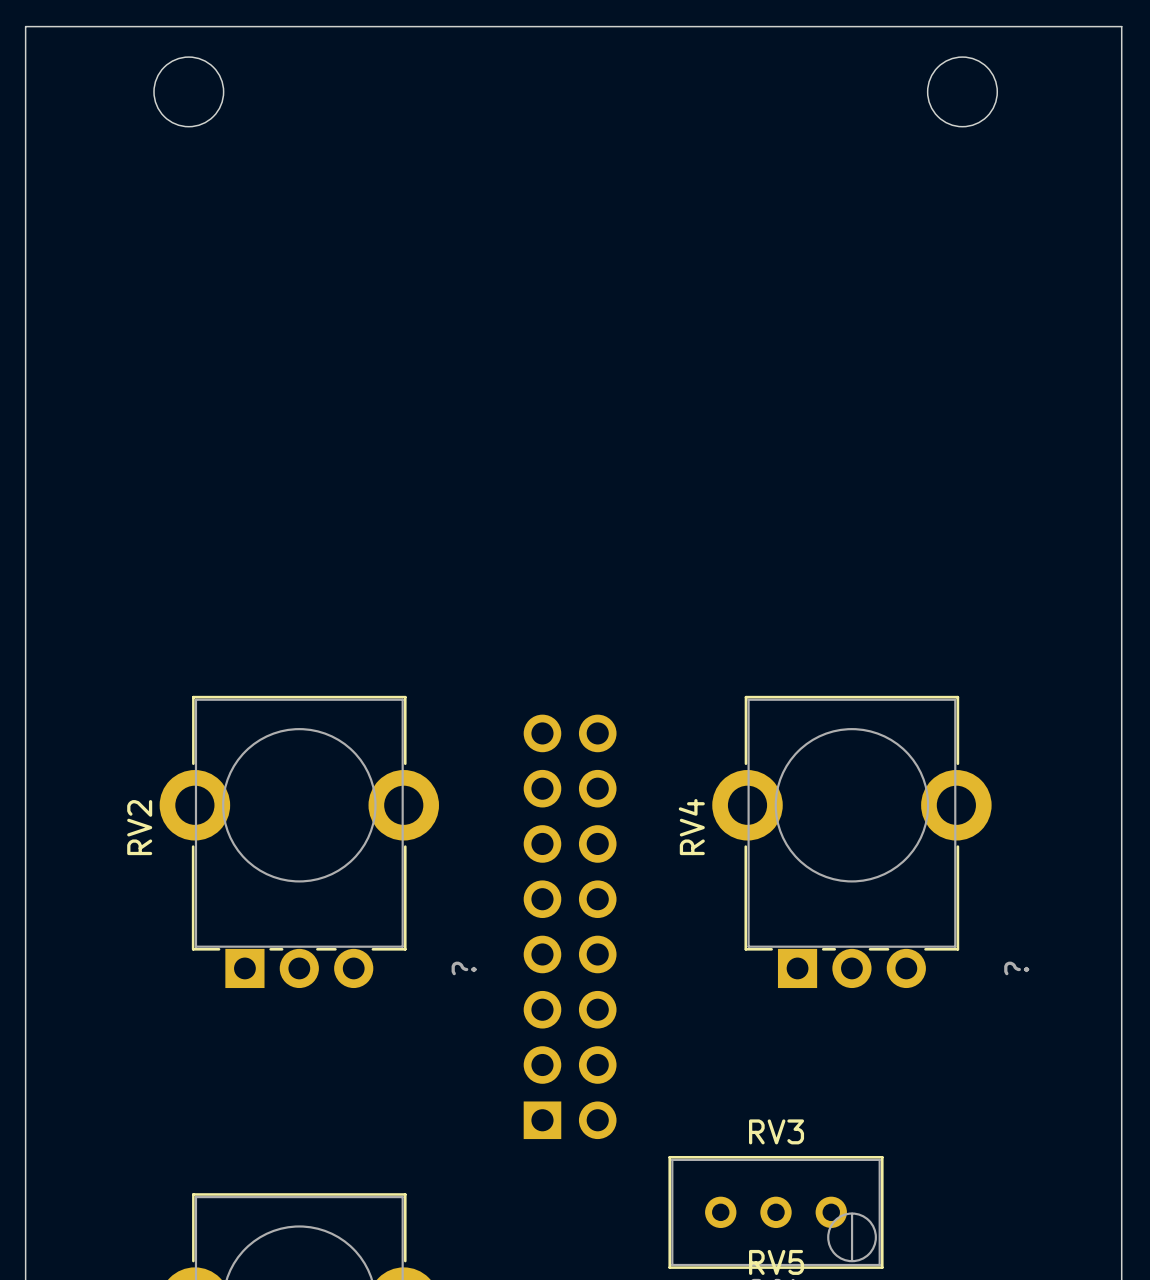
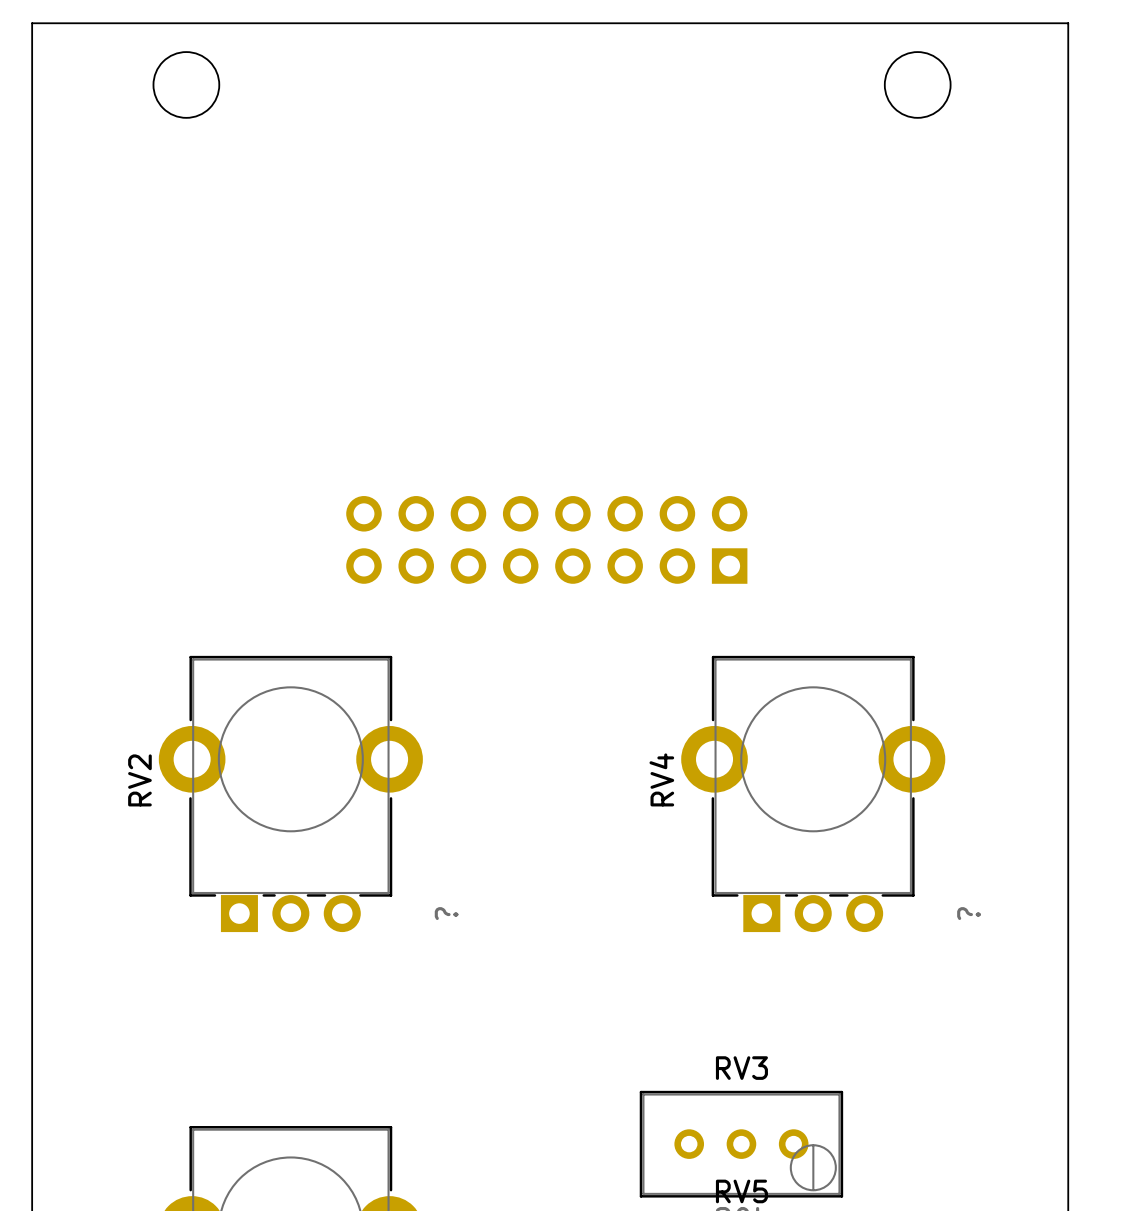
part rotation: 0° (570, 926) -> 90° counterclockwise (546, 539)
part position: (570, 926) -> (546, 539)

